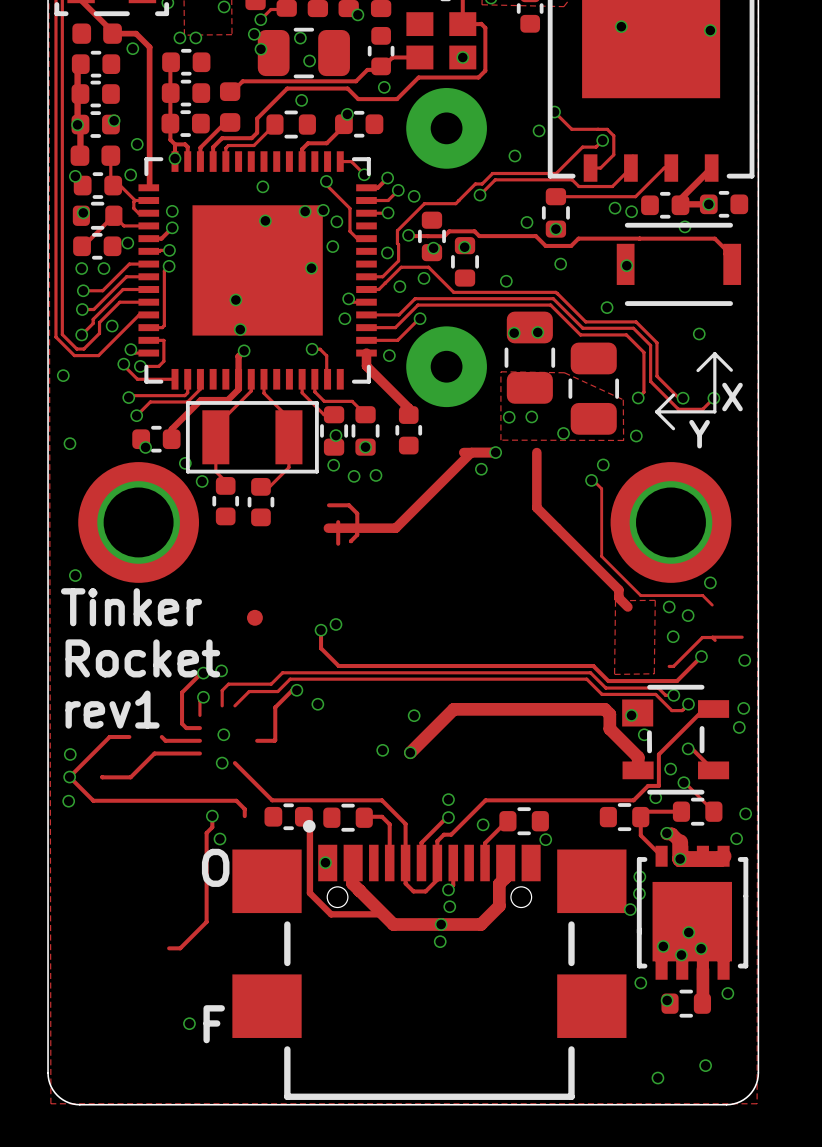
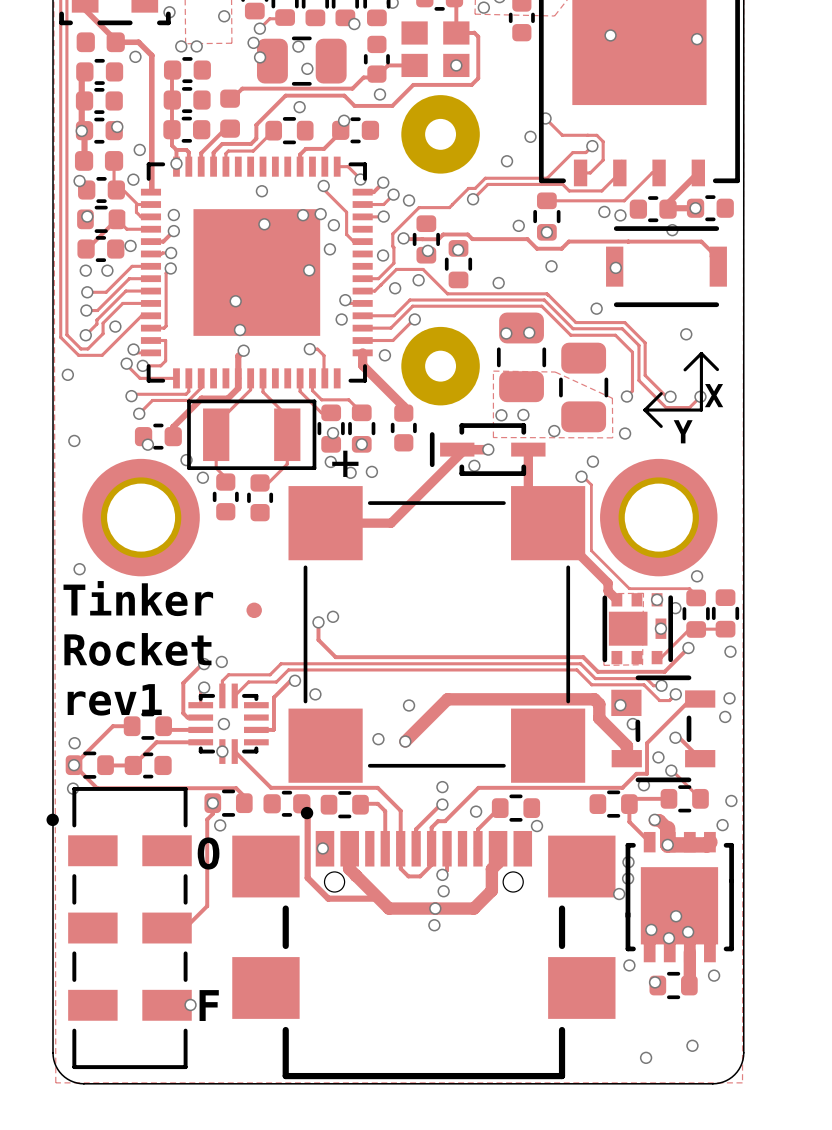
part: none -> (487, 449)
part: none -> (725, 613)
part: none -> (696, 613)
part: none -> (637, 628)
part: none -> (436, 634)
part: none -> (228, 723)
part: none -> (147, 726)
part: none -> (89, 765)
part: none -> (148, 765)
part: none -> (228, 803)
part: none -> (119, 928)

